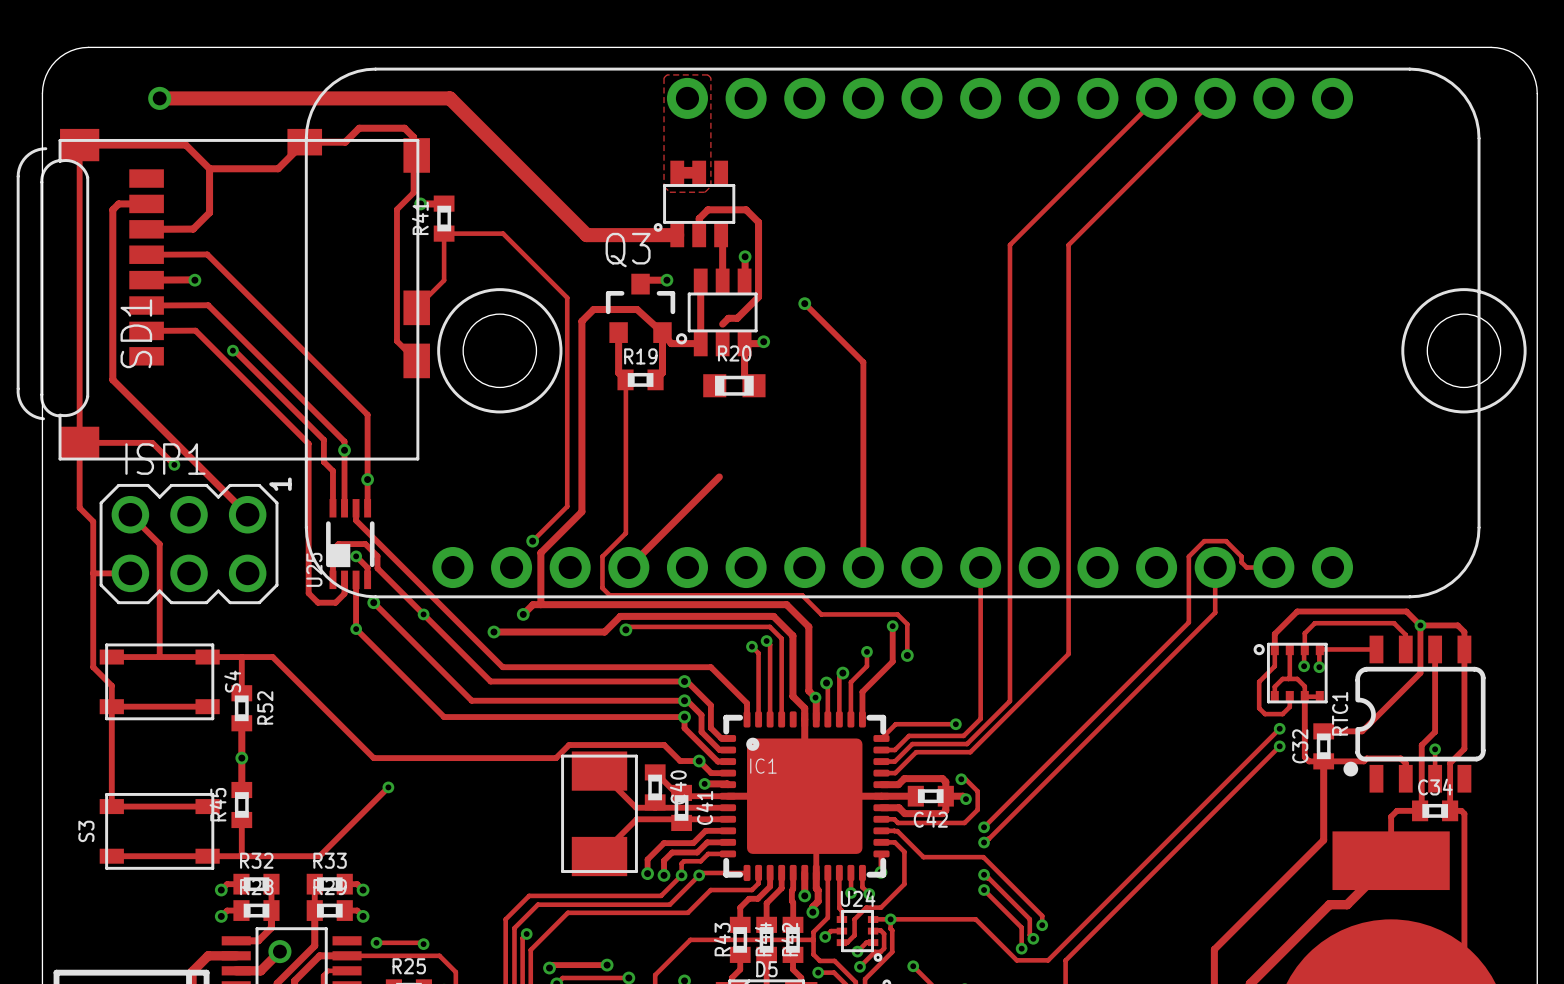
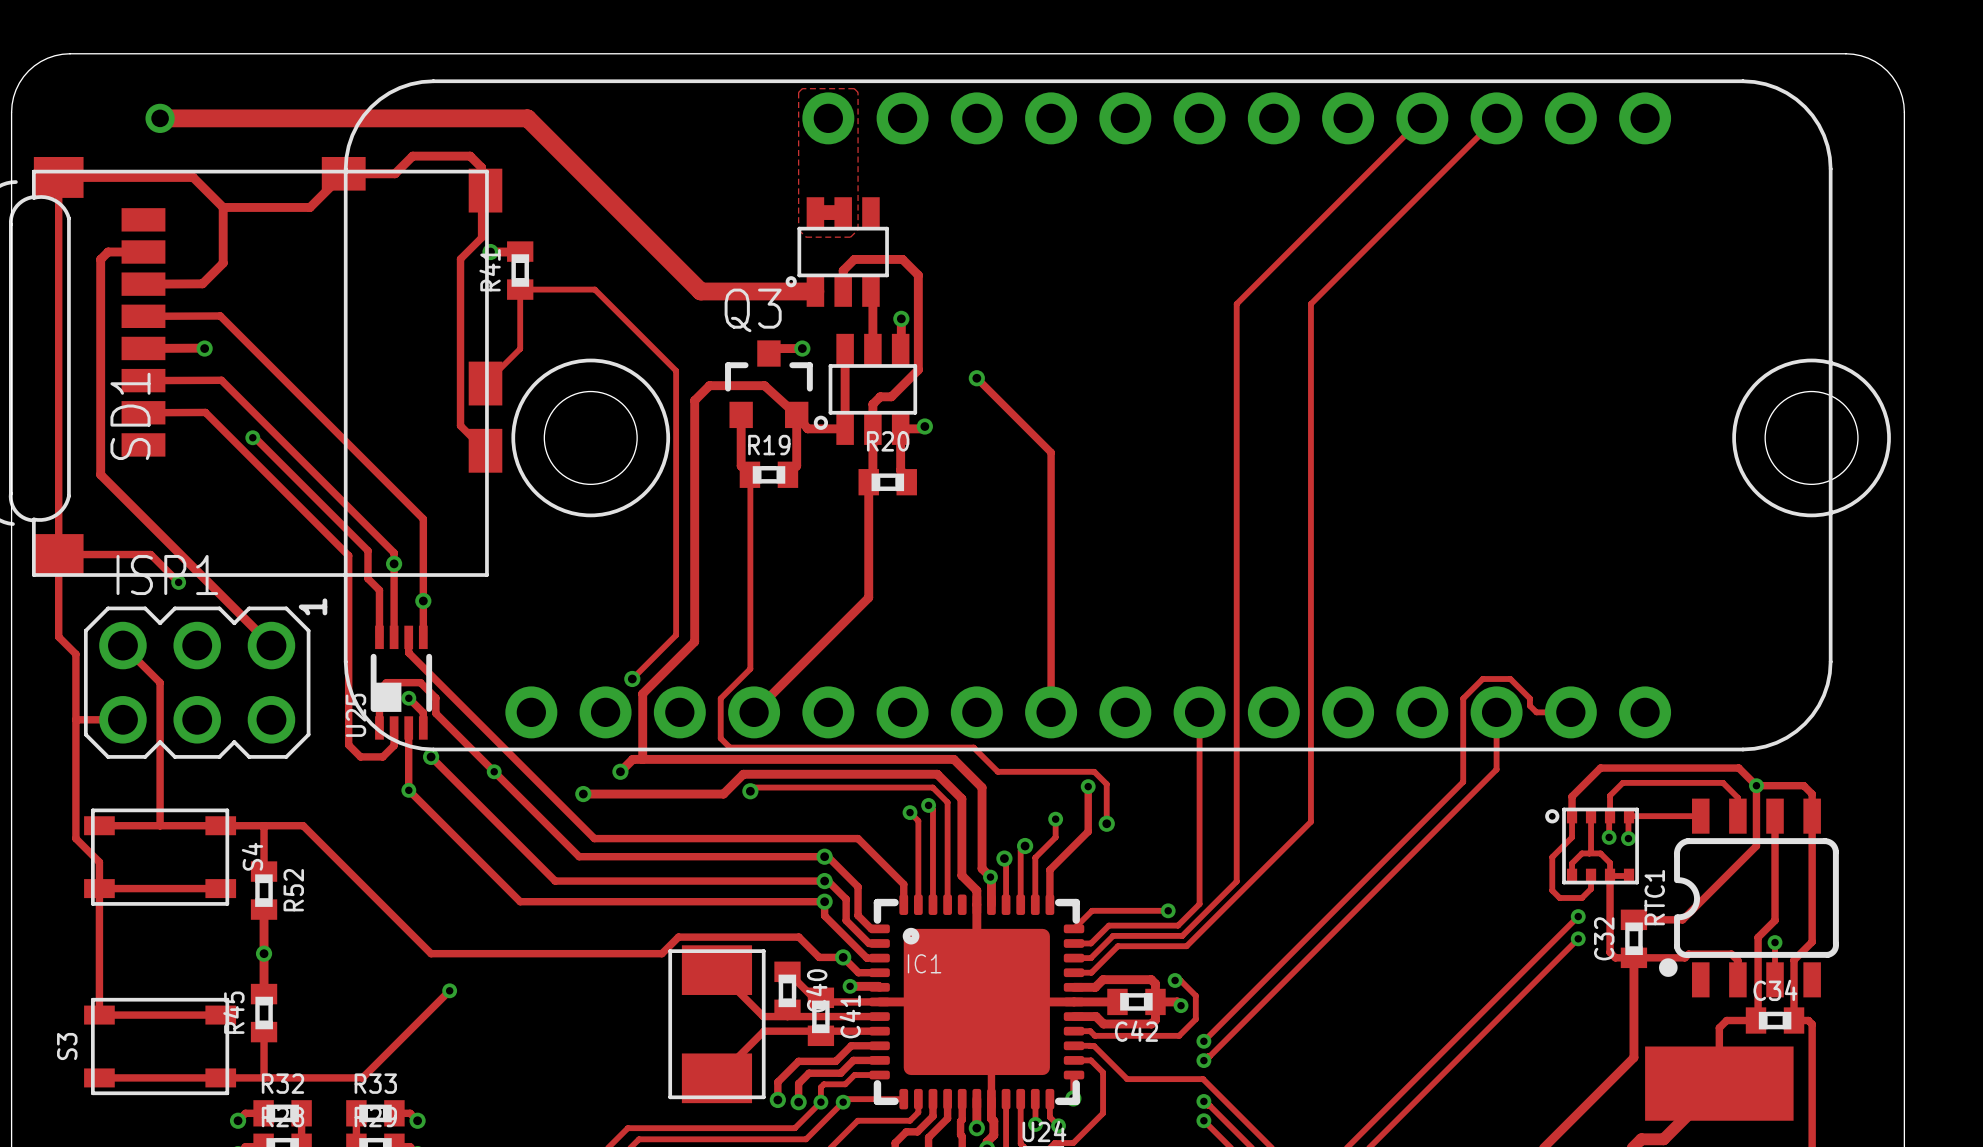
track: none -> (872, 404) (872, 472) (868, 482) (868, 597)
R20 footprint: [703, 374, 766, 398] -> [858, 469, 917, 496]

